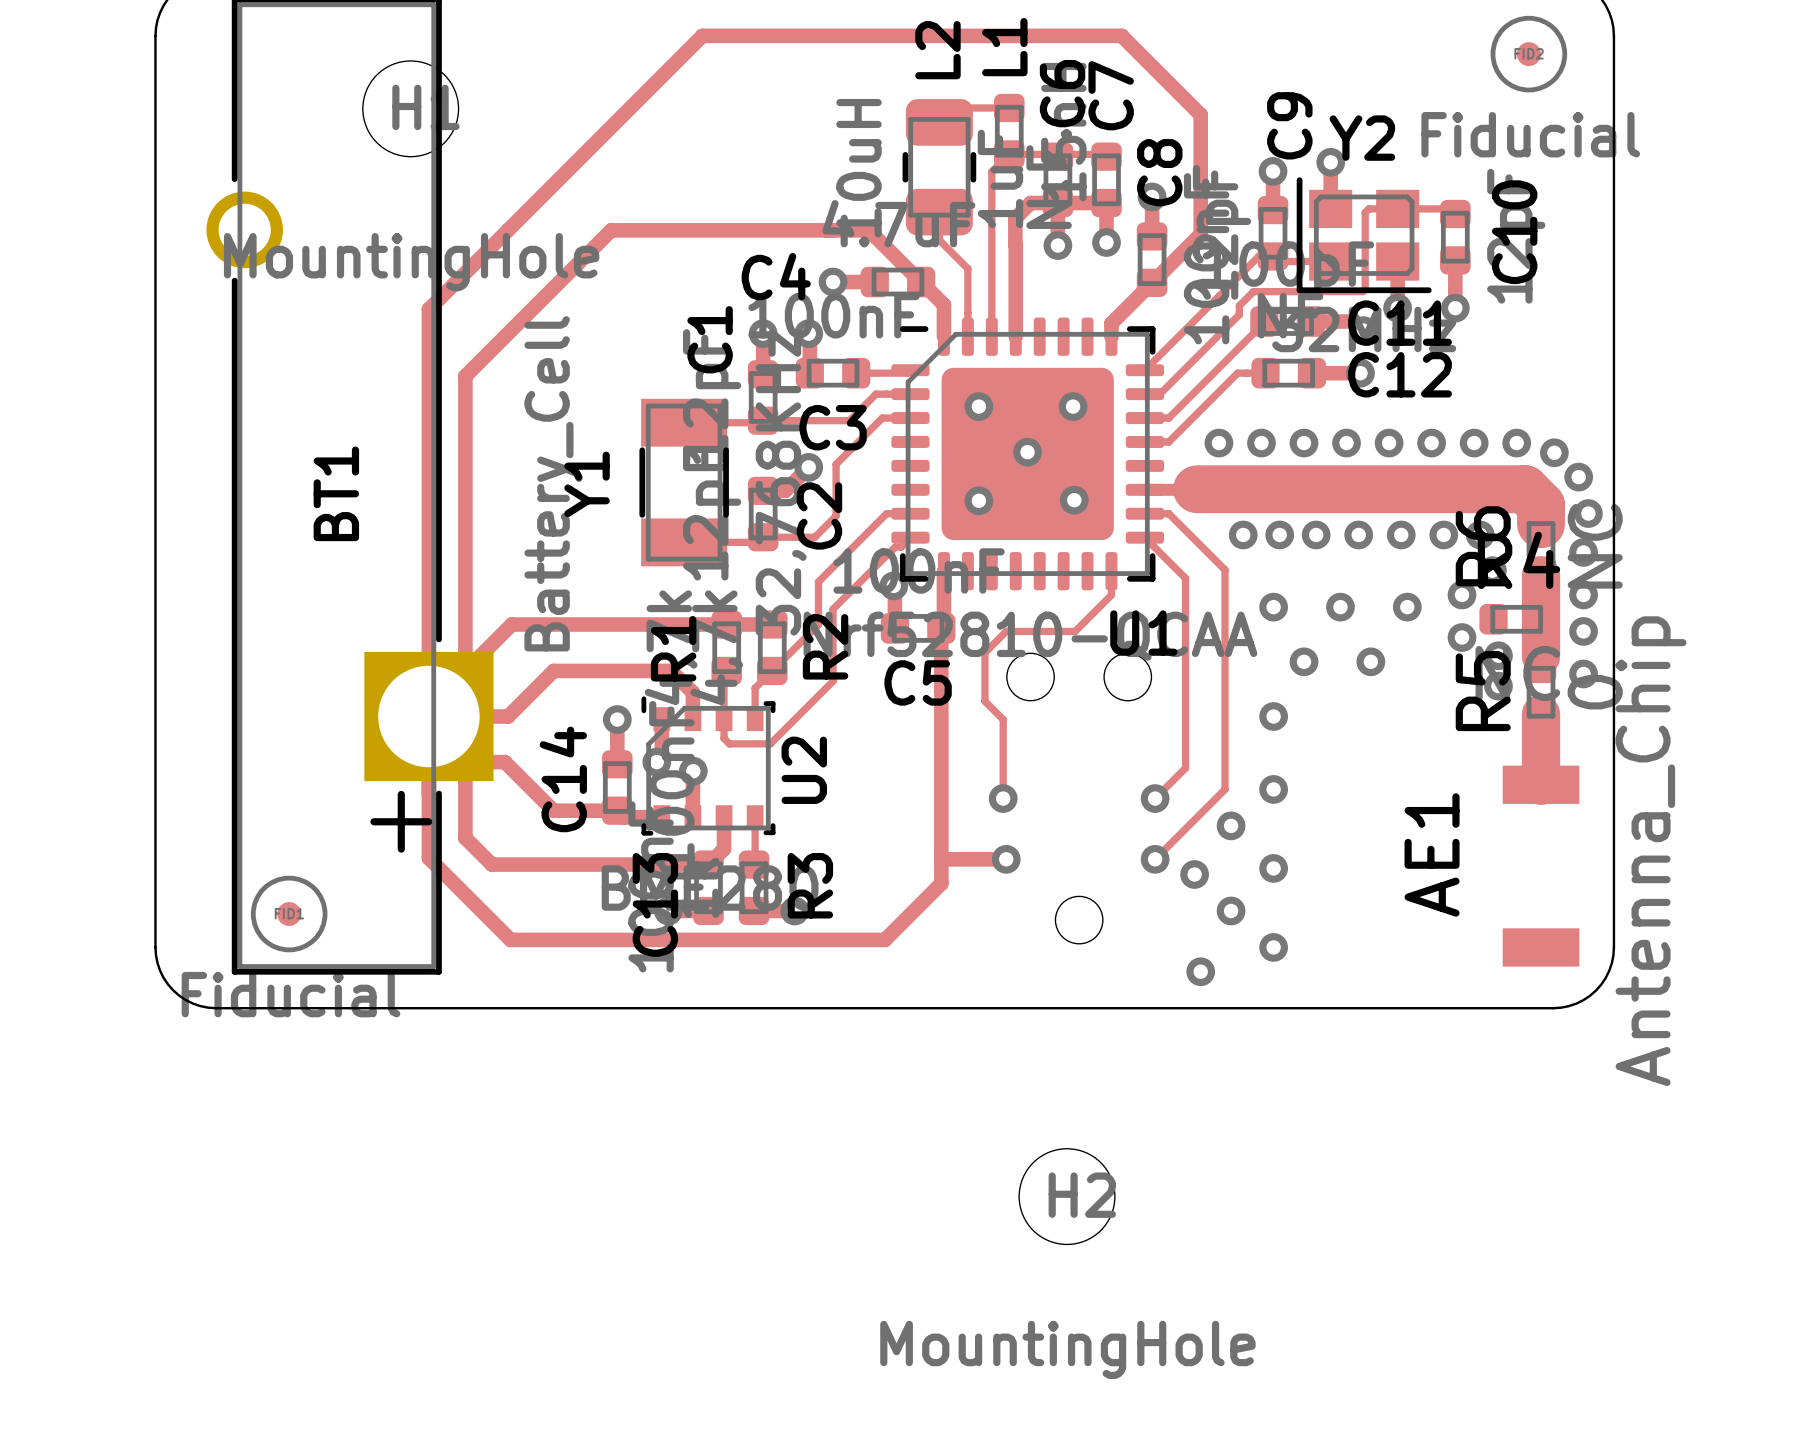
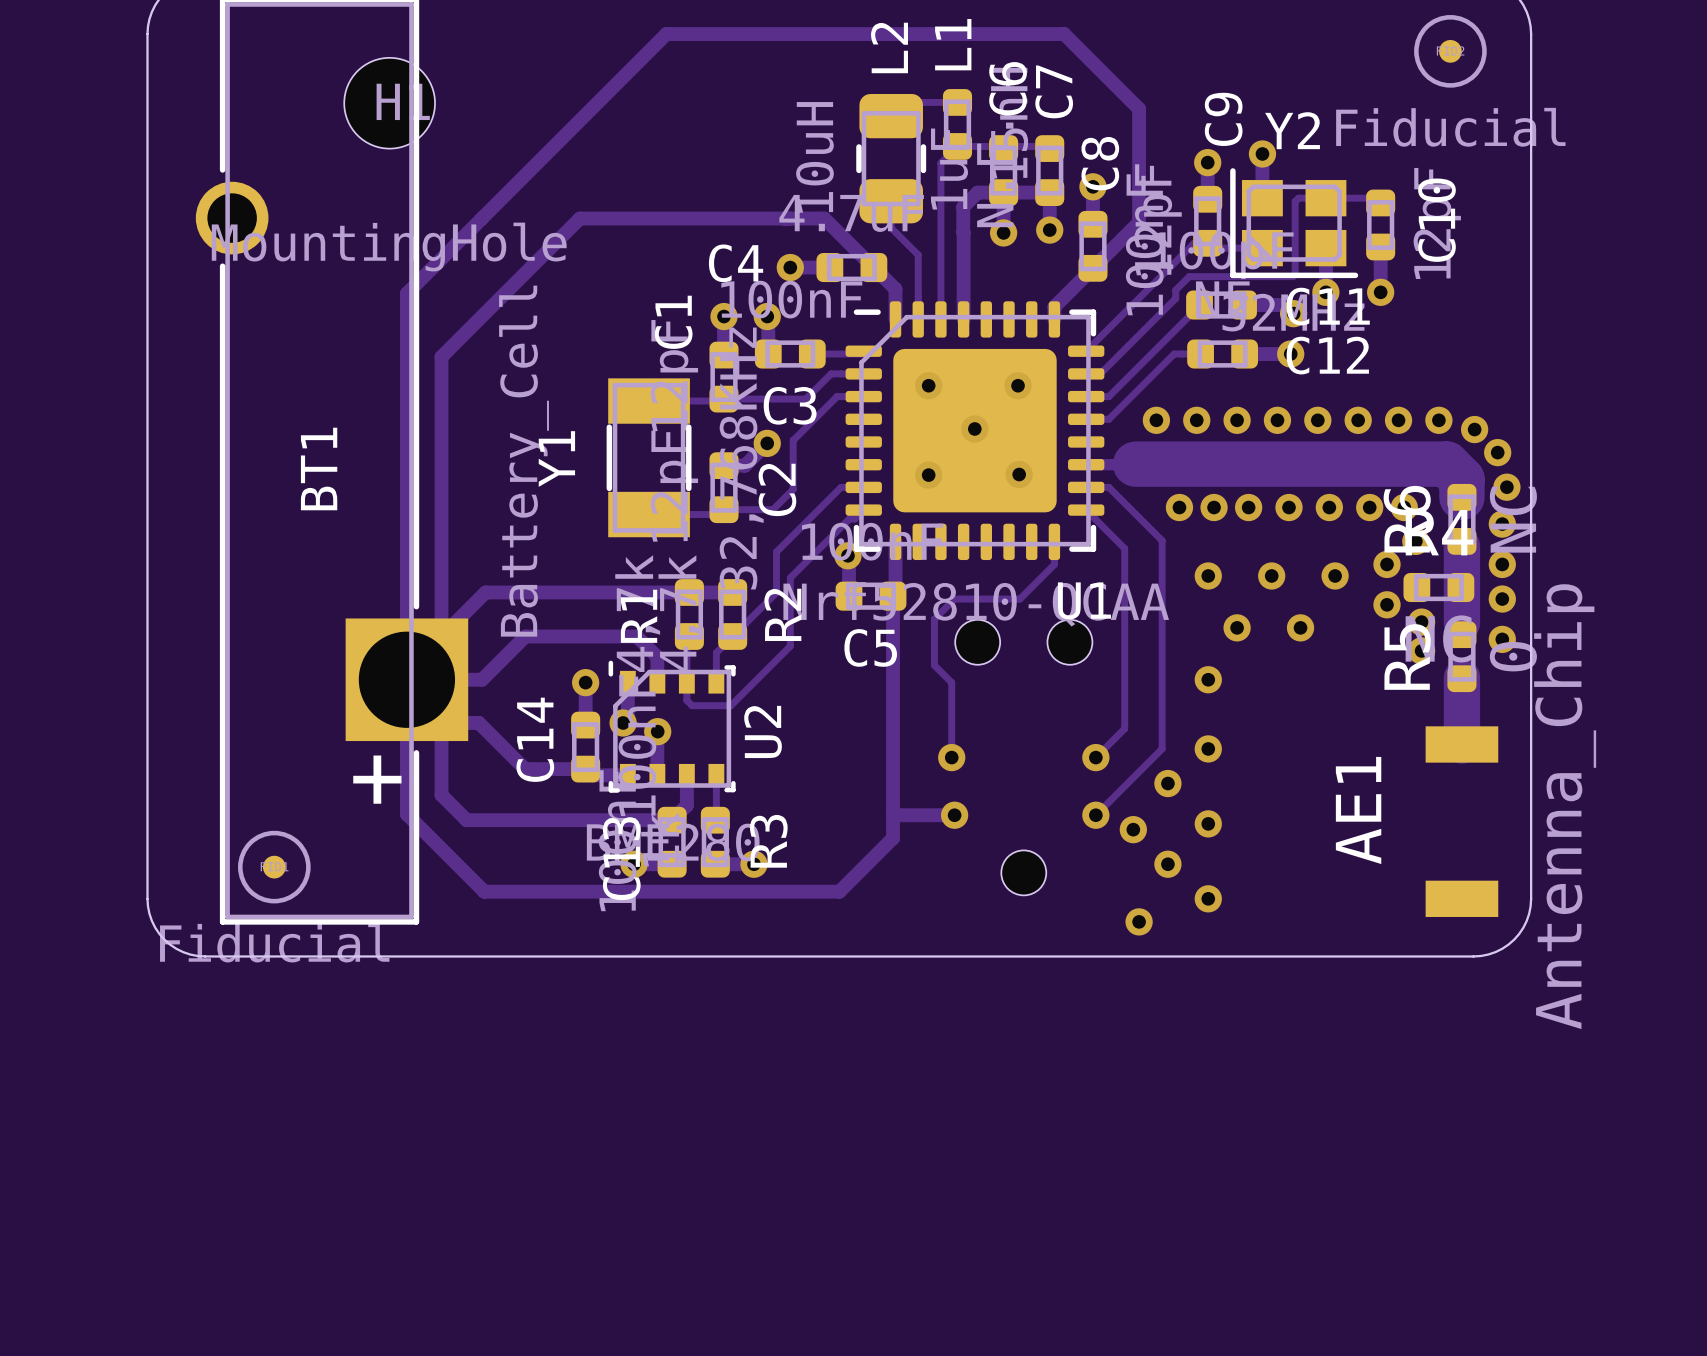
H2: MountingHole (1067, 1196) -> none

